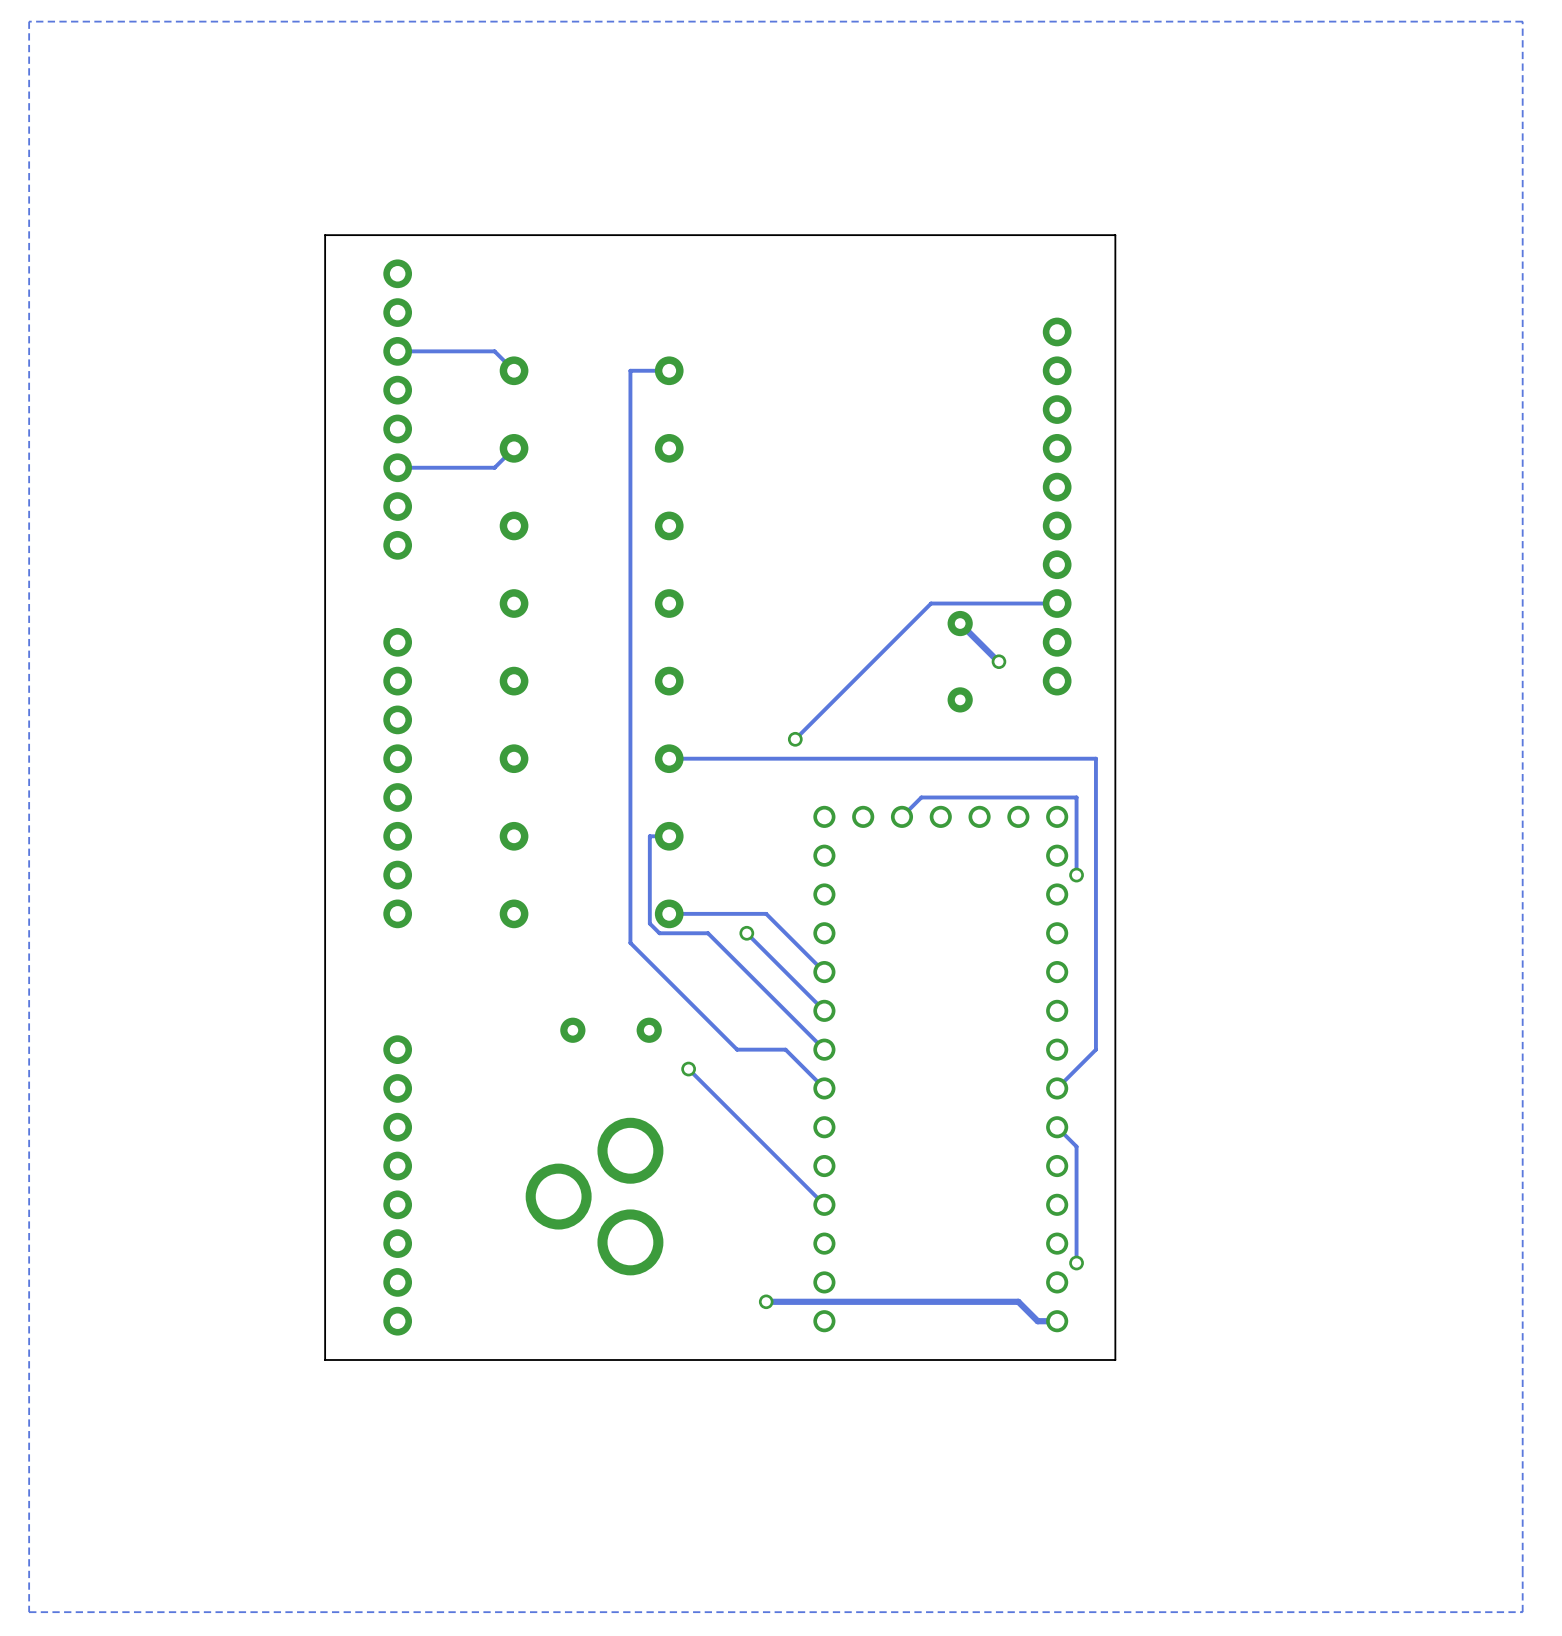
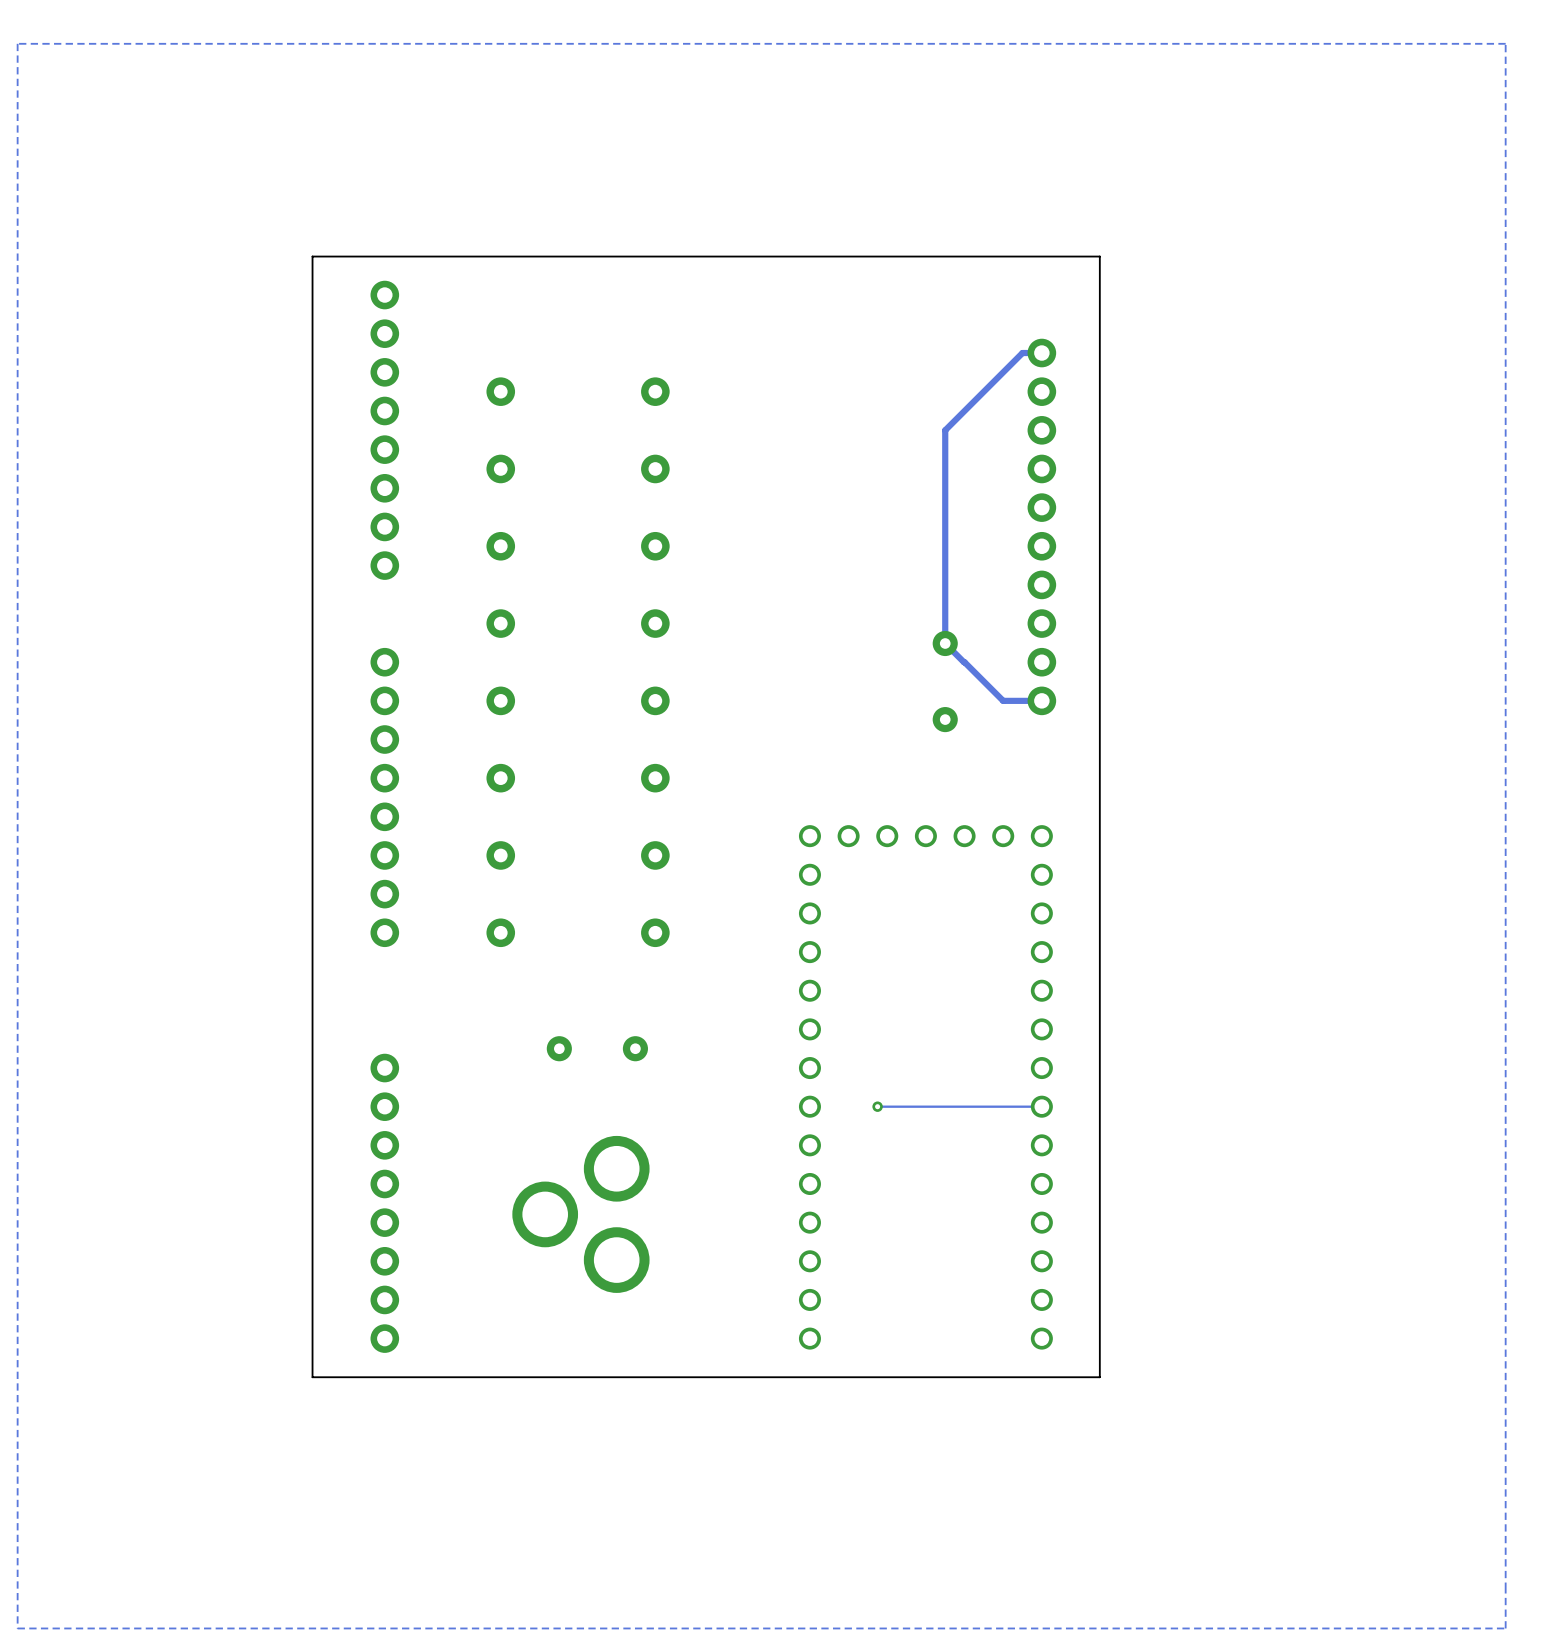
track: none -> (1041, 353) (1022, 353) (945, 430) (945, 643)
track: (397, 351) (494, 351) (514, 370) -> none
track: (669, 370) (630, 370) (630, 942) (737, 1049) (785, 1049) (824, 1088) -> none
track: (514, 448) (494, 467) (397, 467) -> none
track: (1057, 603) (931, 603) (795, 739) -> none
track: (978, 642) (998, 661) -> (963, 662) (1003, 700) (1041, 700)
via: (998, 661) -> none
via: (795, 739) -> none
track: (669, 758) (1095, 758) (1095, 1049) (1057, 1088) -> (877, 1106) (1041, 1106)
track: (901, 816) (921, 797) (1076, 797) (1076, 875) -> none
track: (669, 836) (649, 836) (649, 923) (659, 933) (708, 933) (824, 1049) -> none
via: (1076, 875) -> none
track: (669, 913) (766, 913) (824, 972) -> none
track: (746, 933) (824, 1010) -> none
via: (746, 933) -> none
track: (688, 1069) (824, 1204) -> none
via: (688, 1069) -> none
via: none -> (877, 1106)
track: (1057, 1127) (1076, 1146) (1076, 1263) -> none
via: (1076, 1263) -> none
track: (766, 1301) (1018, 1301) (1037, 1321) (1057, 1321) -> none
via: (766, 1301) -> none

